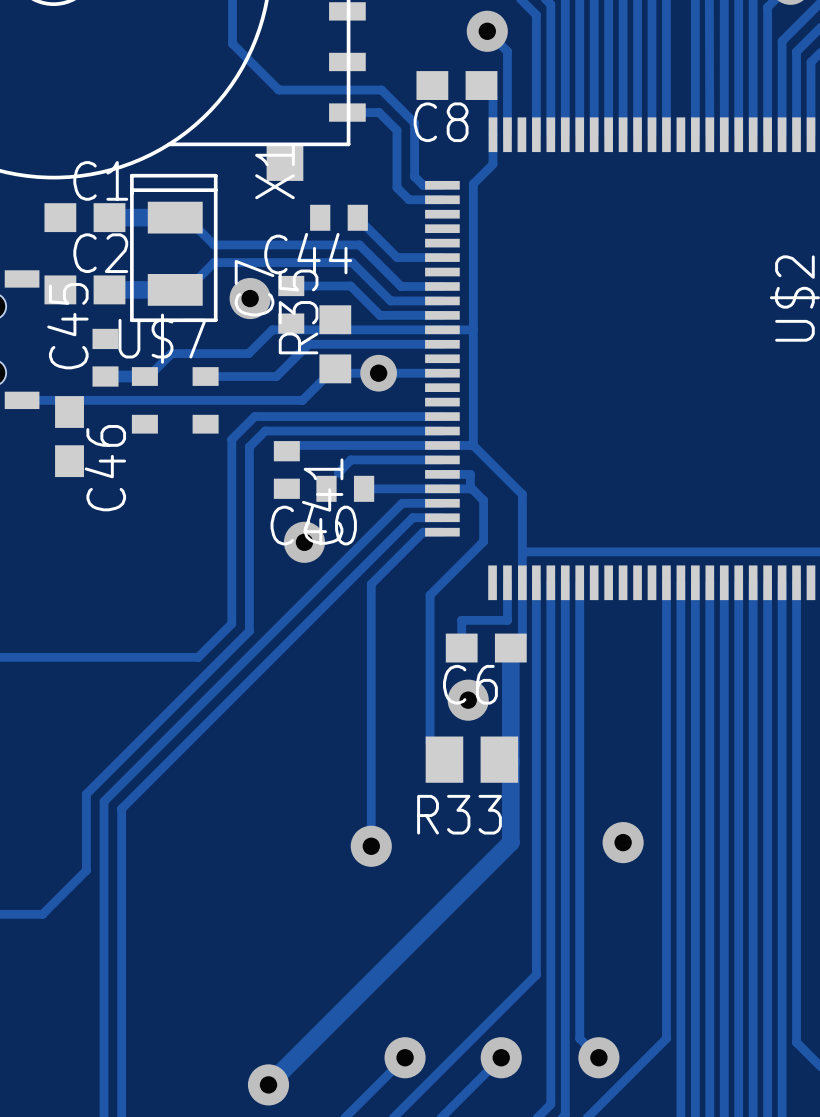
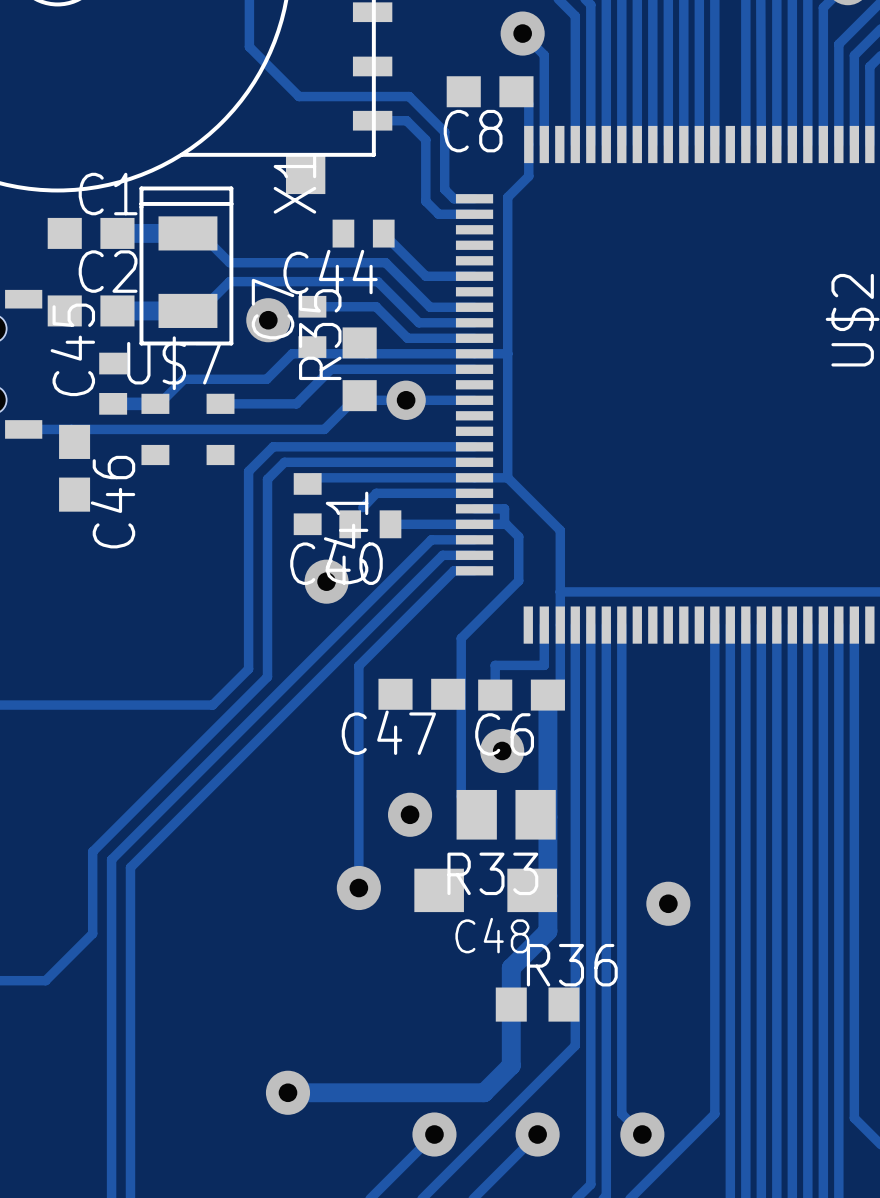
track: (371, 584) (371, 846) -> (398, 626) (358, 665) (358, 888)
C47: none -> (421, 694)
via: none -> (410, 814)
C48: none -> (485, 890)
track: (510, 842) (268, 1084) -> (547, 903) (547, 931) (511, 967) (511, 1065) (484, 1092) (287, 1092)
via position: (371, 846) -> (358, 888)
R36: none -> (537, 1004)
via position: (268, 1084) -> (287, 1092)

